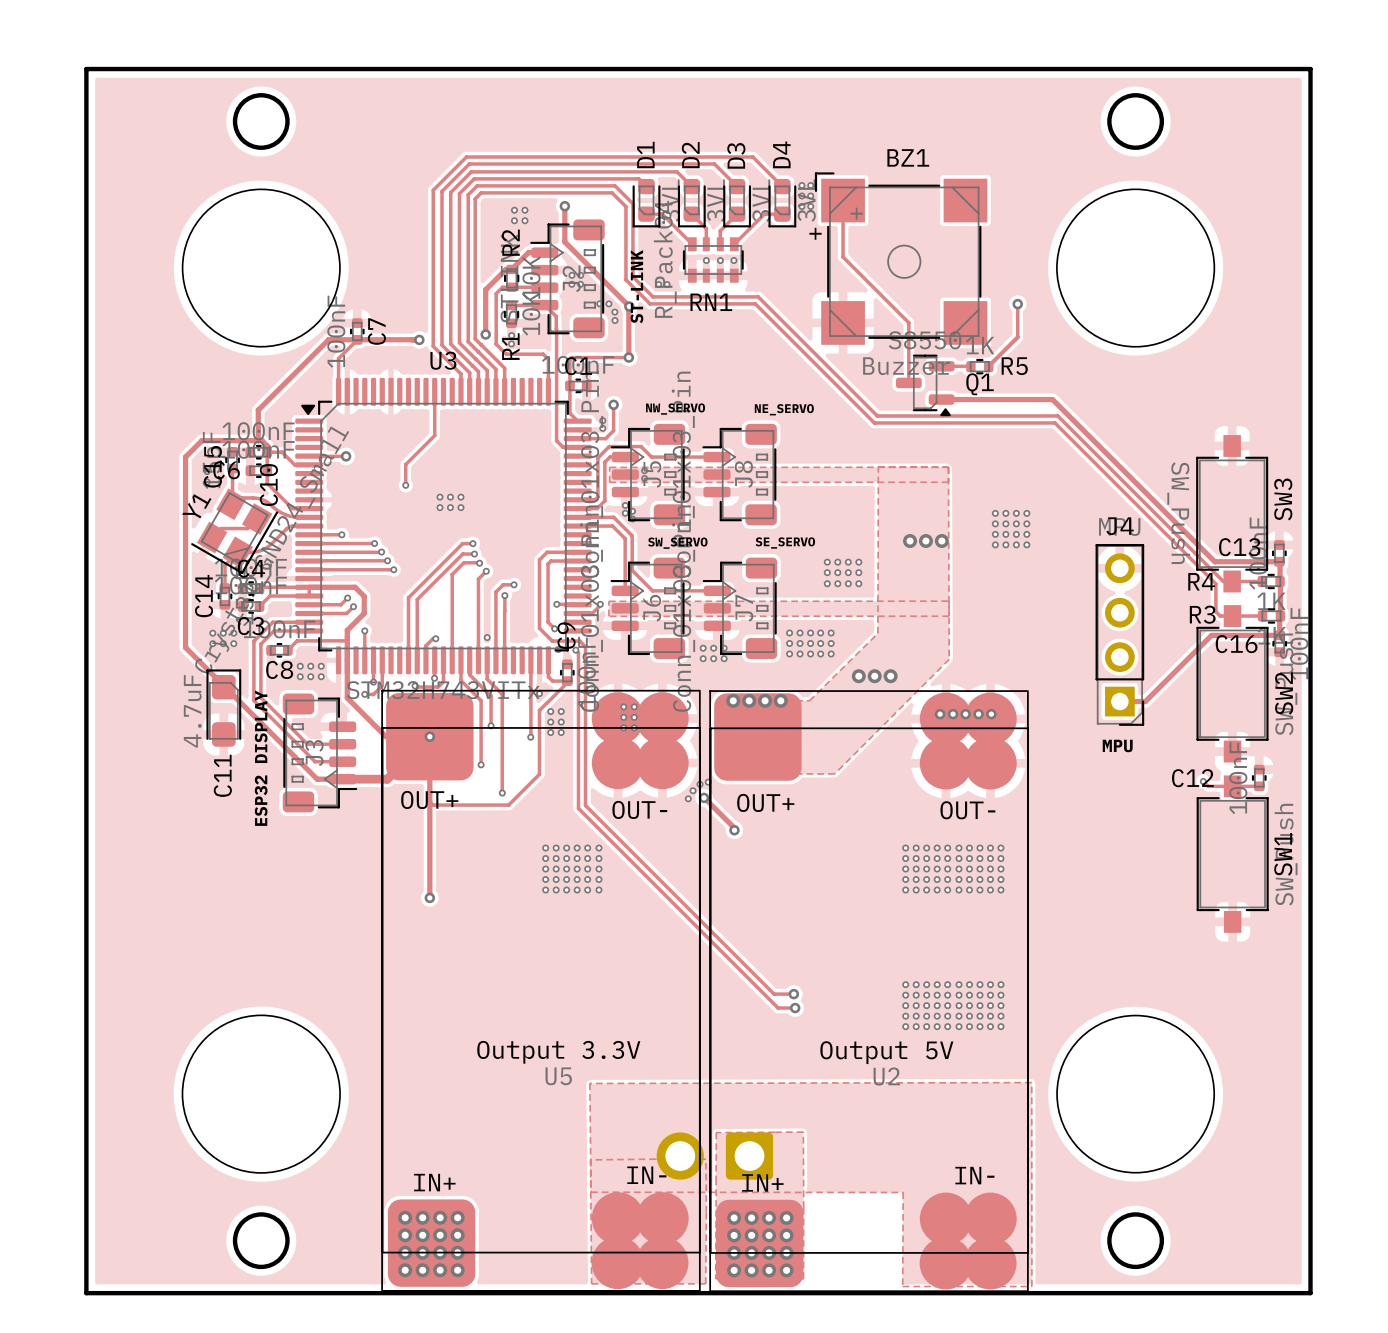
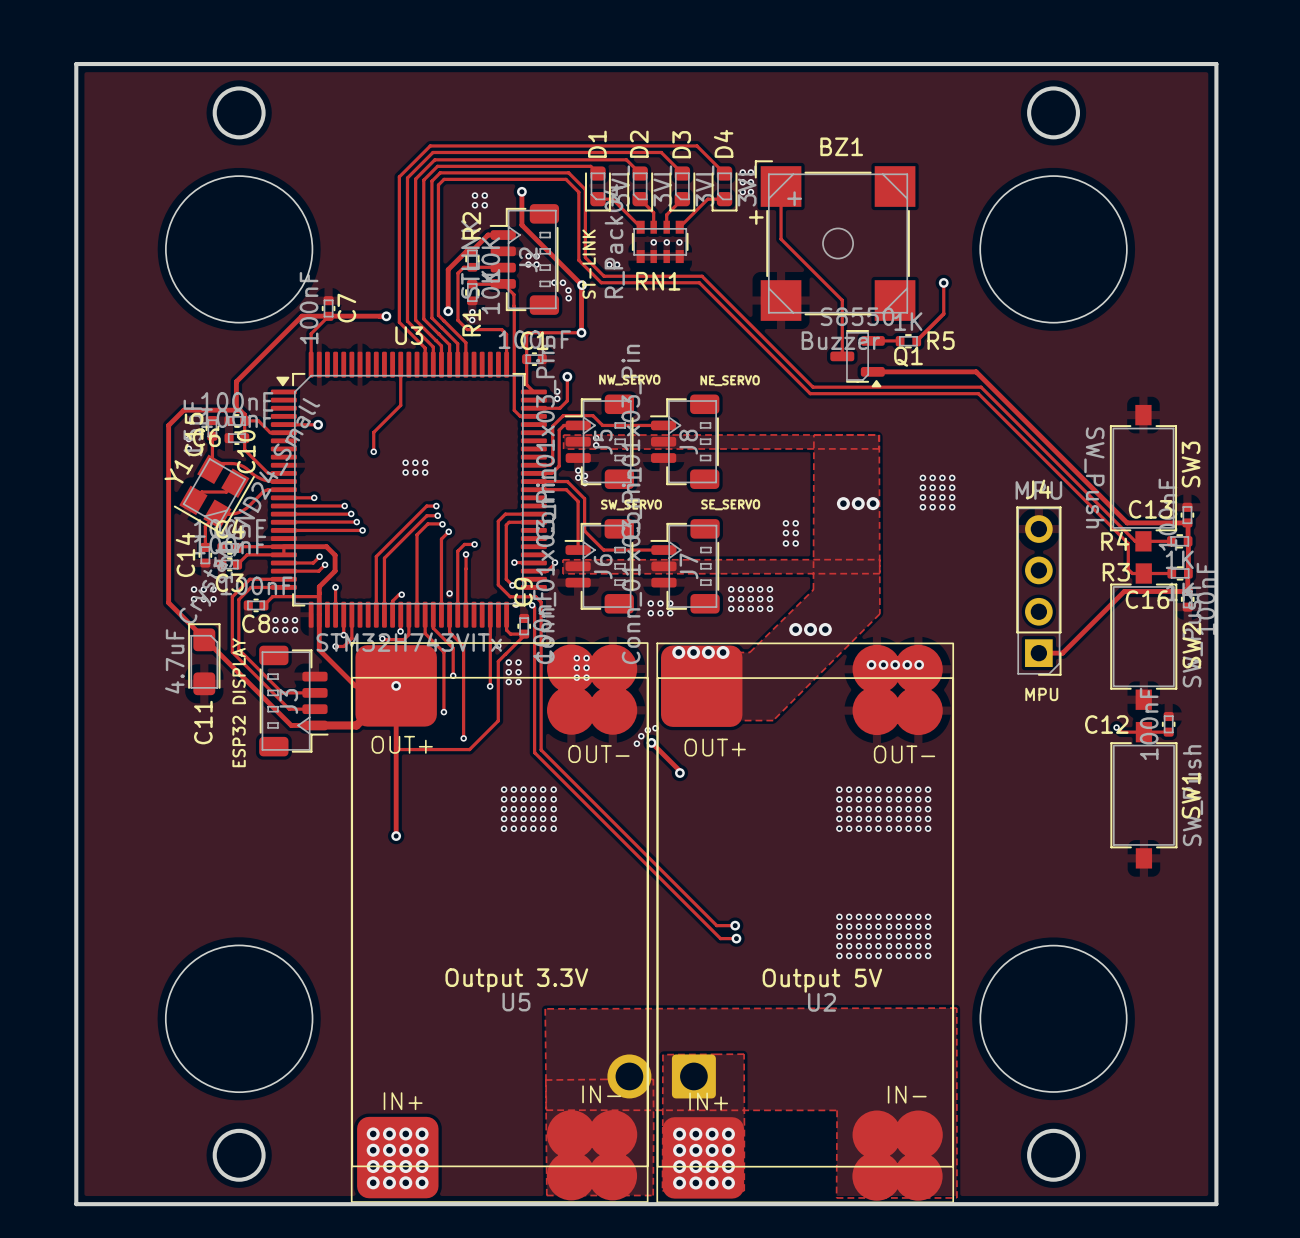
via: (827, 562) -> none
via: (837, 562) -> none
via: (827, 572) -> none
via: (837, 572) -> none
via: (827, 583) -> none
via: (837, 583) -> none

